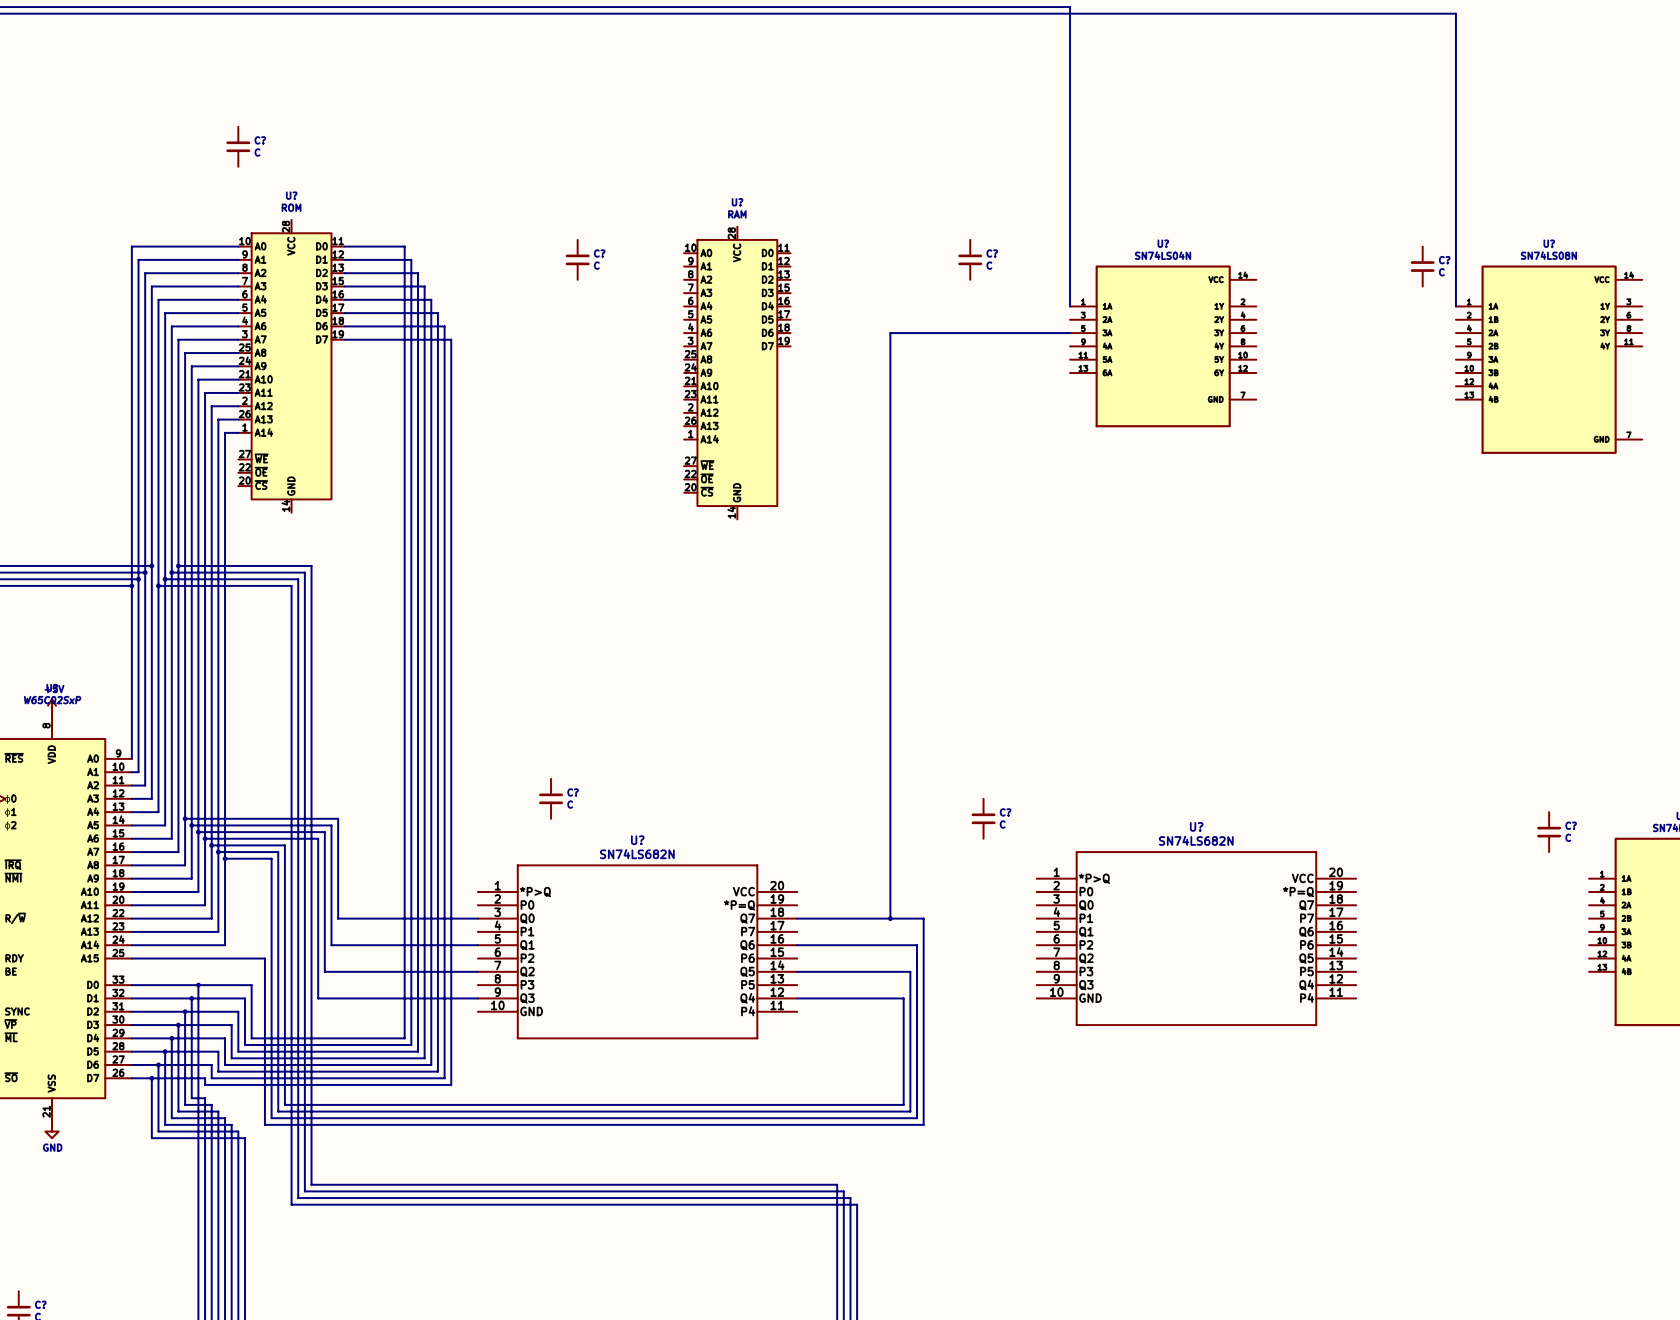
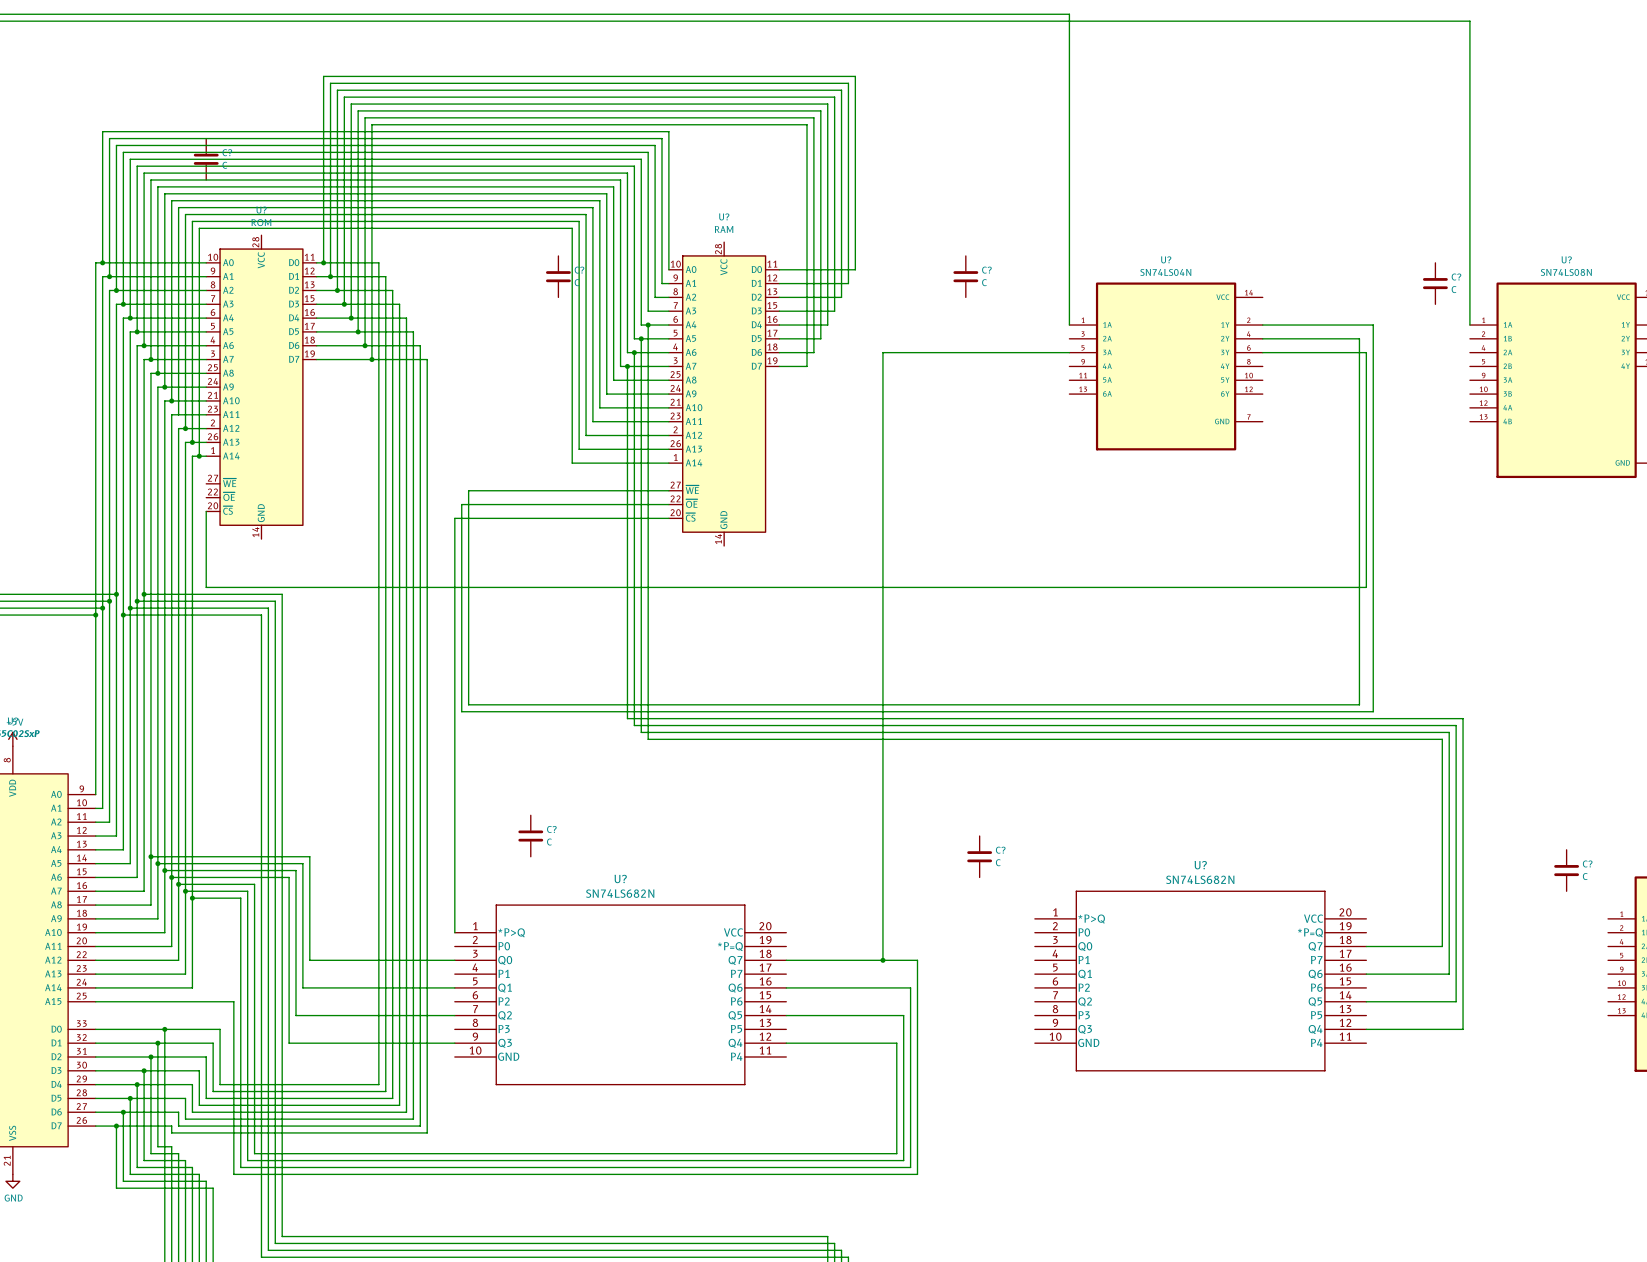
wire: none -> (102, 262) (102, 131) (668, 131) (668, 269)
junction: none -> (102, 262)
wire: none -> (323, 262) (323, 76) (855, 76) (855, 269) (779, 269)
junction: none -> (323, 262)
wire: none -> (109, 276) (109, 138) (661, 138) (661, 283) (668, 283)
junction: none -> (109, 276)
wire: none -> (330, 276) (330, 83) (848, 83) (848, 283) (779, 283)
junction: none -> (330, 276)
wire: none -> (116, 290) (116, 145) (655, 145) (655, 297) (668, 297)
junction: none -> (116, 290)
wire: none -> (337, 290) (337, 90) (841, 90) (841, 297) (779, 297)
junction: none -> (337, 290)
wire: none -> (123, 304) (123, 152) (648, 152) (648, 311) (668, 311)
junction: none -> (123, 304)
wire: none -> (344, 304) (344, 97) (834, 97) (834, 311) (779, 311)
junction: none -> (344, 304)
wire: none -> (130, 318) (130, 159) (641, 159) (641, 325) (668, 325)
junction: none -> (130, 318)
wire: none -> (351, 318) (351, 104) (827, 104) (827, 325) (779, 325)
junction: none -> (351, 318)
wire: none -> (648, 325) (648, 739) (1442, 739) (1442, 946) (1366, 946)
junction: none -> (648, 325)
wire: none -> (1262, 325) (1373, 325) (1373, 711) (461, 711) (461, 504) (668, 504)
wire: none -> (137, 331) (137, 166) (634, 166) (634, 338) (668, 338)
junction: none -> (137, 331)
wire: none -> (358, 331) (358, 110) (820, 110) (820, 338) (779, 338)
junction: none -> (358, 331)
wire: none -> (641, 338) (641, 732) (1449, 732) (1449, 974) (1366, 974)
junction: none -> (641, 338)
wire: none -> (1262, 338) (1359, 338) (1359, 704) (468, 704) (468, 490) (668, 490)
wire: none -> (144, 345) (144, 173) (627, 173) (627, 352) (668, 352)
junction: none -> (144, 345)
wire: none -> (365, 345) (365, 117) (813, 117) (813, 352) (779, 352)
junction: none -> (365, 345)
wire: none -> (634, 352) (634, 725) (1456, 725) (1456, 1001) (1366, 1001)
junction: none -> (634, 352)
wire: none -> (1262, 352) (1366, 352) (1366, 587) (206, 587) (206, 511)
wire: none -> (150, 359) (150, 180) (620, 180) (620, 366) (668, 366)
junction: none -> (150, 359)
wire: none -> (371, 359) (371, 124) (807, 124) (807, 366) (779, 366)
junction: none -> (371, 359)
wire: none -> (627, 366) (627, 718) (1463, 718) (1463, 1029) (1366, 1029)
junction: none -> (627, 366)
wire: none -> (157, 373) (157, 186) (613, 186) (613, 380) (668, 380)
junction: none -> (157, 373)
wire: none -> (164, 387) (164, 193) (606, 193) (606, 394) (668, 394)
junction: none -> (164, 387)
wire: none -> (171, 400) (171, 200) (599, 200) (599, 407) (668, 407)
junction: none -> (171, 400)
wire: none -> (178, 414) (178, 207) (592, 207) (592, 421) (668, 421)
wire: none -> (185, 428) (185, 214) (586, 214) (586, 435) (668, 435)
junction: none -> (185, 428)
wire: none -> (192, 442) (192, 221) (579, 221) (579, 449) (668, 449)
junction: none -> (192, 442)
wire: none -> (199, 456) (199, 228) (572, 228) (572, 463) (668, 463)
junction: none -> (199, 456)
wire: none -> (668, 518) (454, 518) (454, 932)

